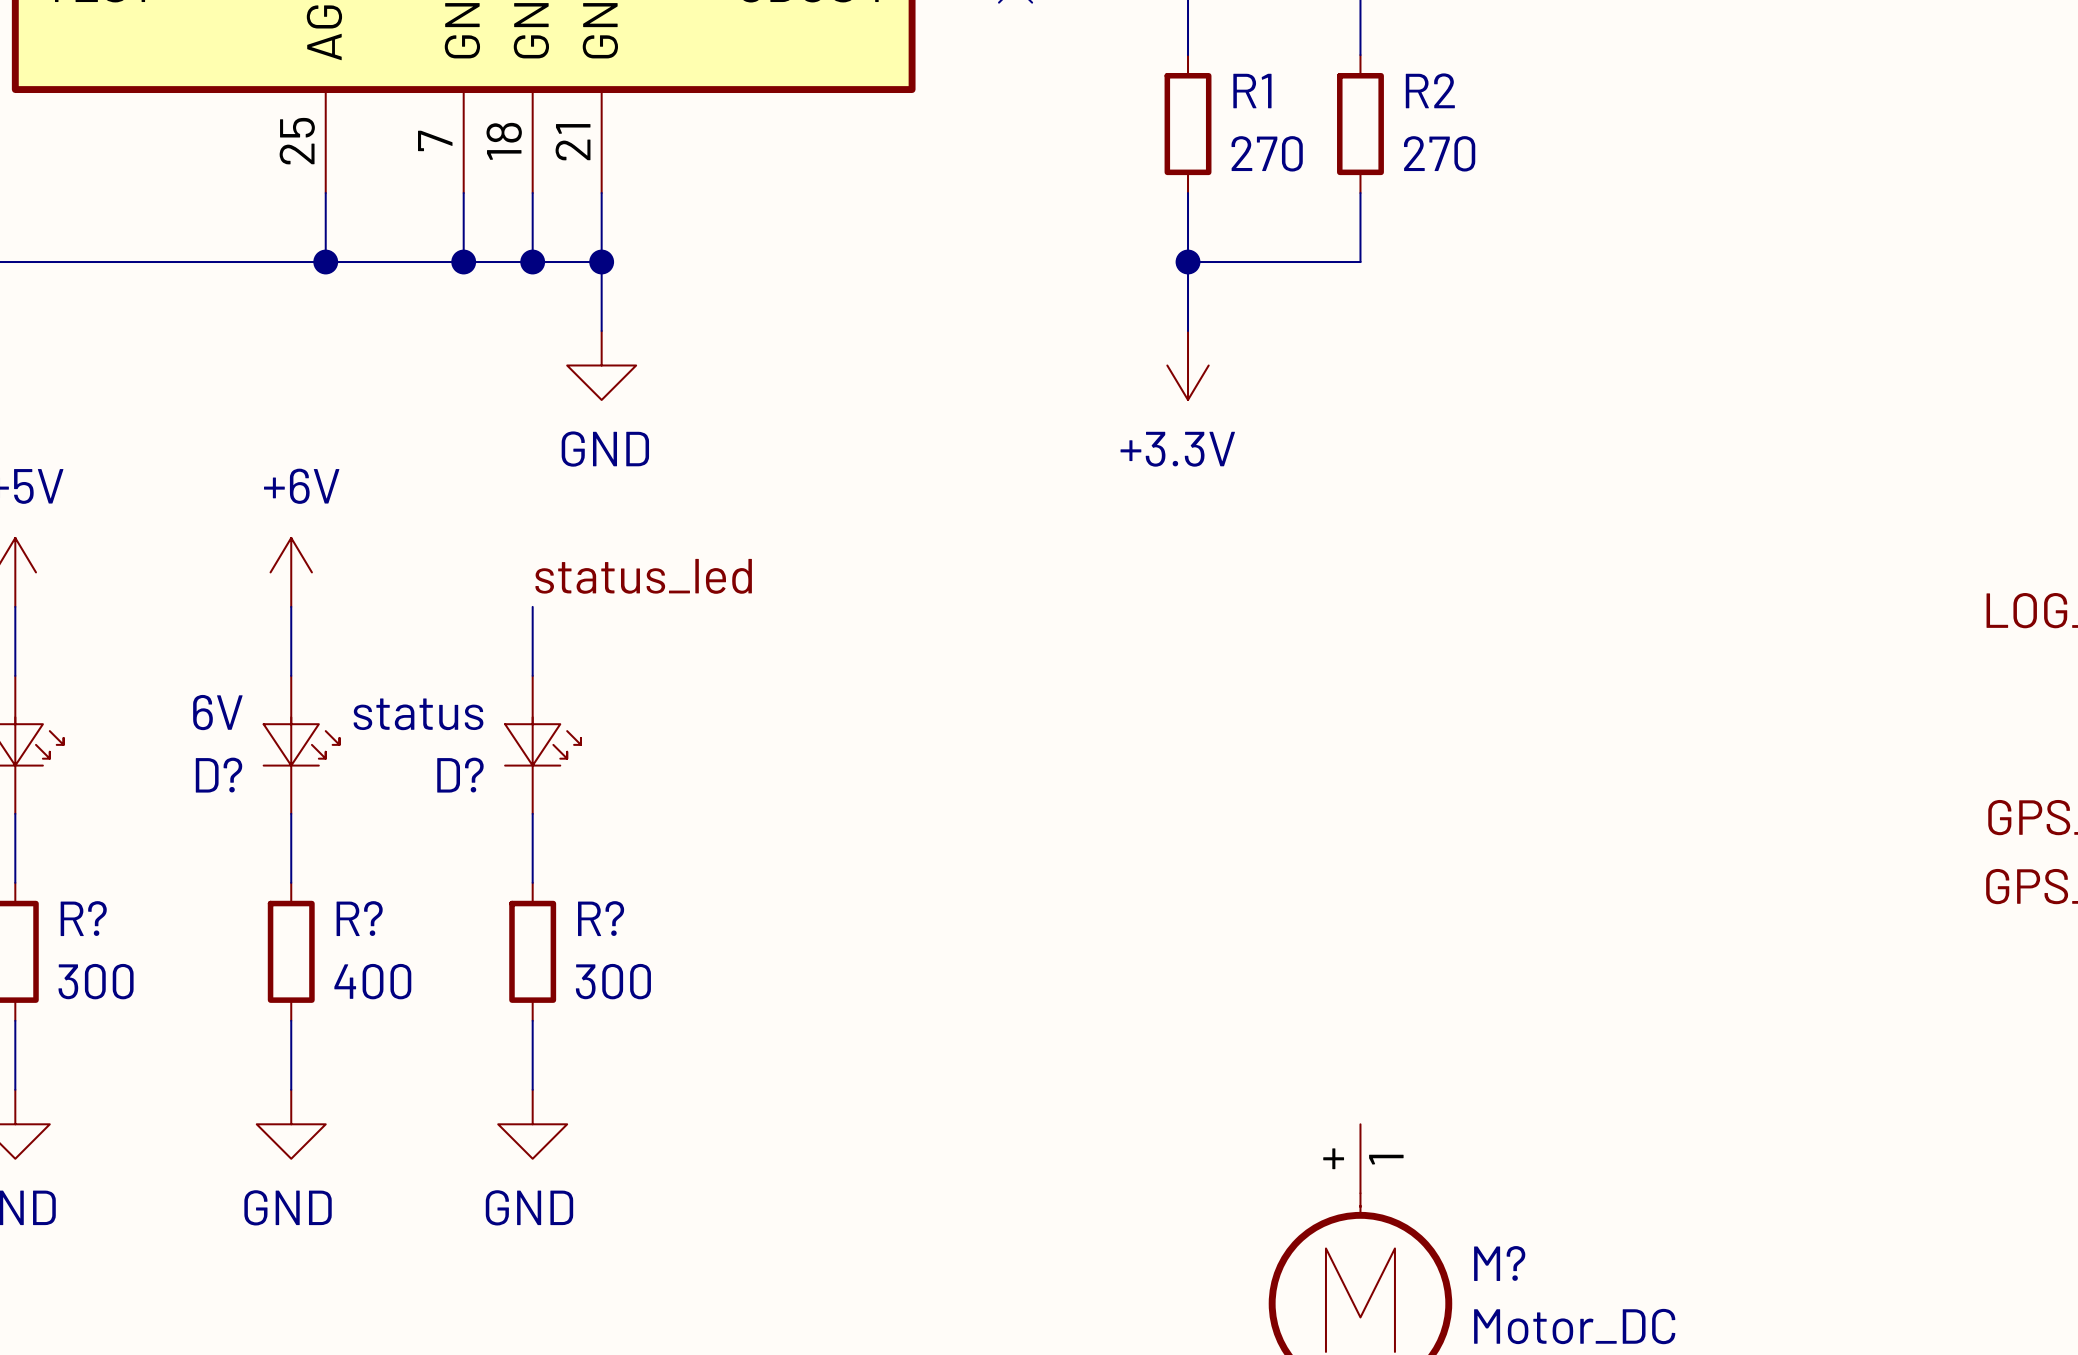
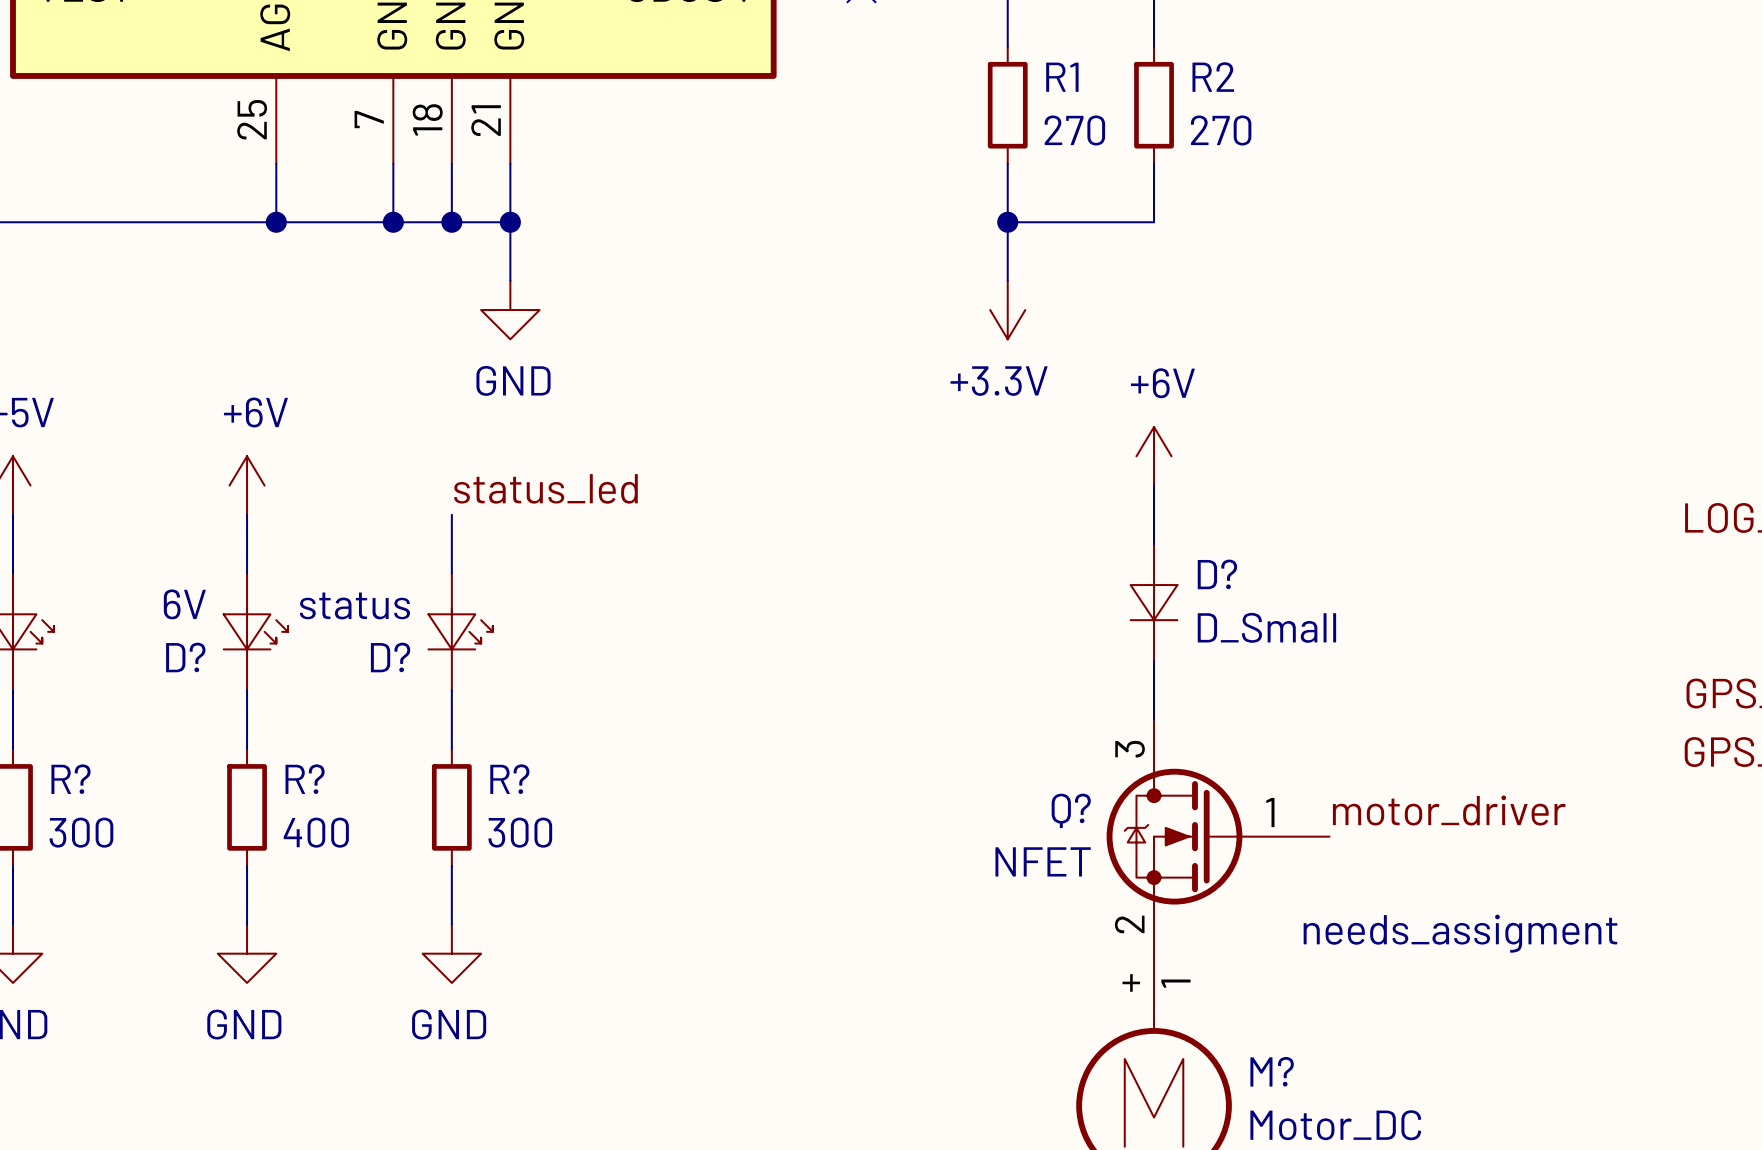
power symbol: none -> +6V (1154, 456)
wire: none -> (1154, 485) (1154, 544)
D?: none -> D_Small (1154, 602)
wire: none -> (1154, 661) (1154, 719)
label: none -> motor_driver (1449, 810)
Q?: none -> NFET (1218, 836)
text: none -> needs_assigment (1460, 933)

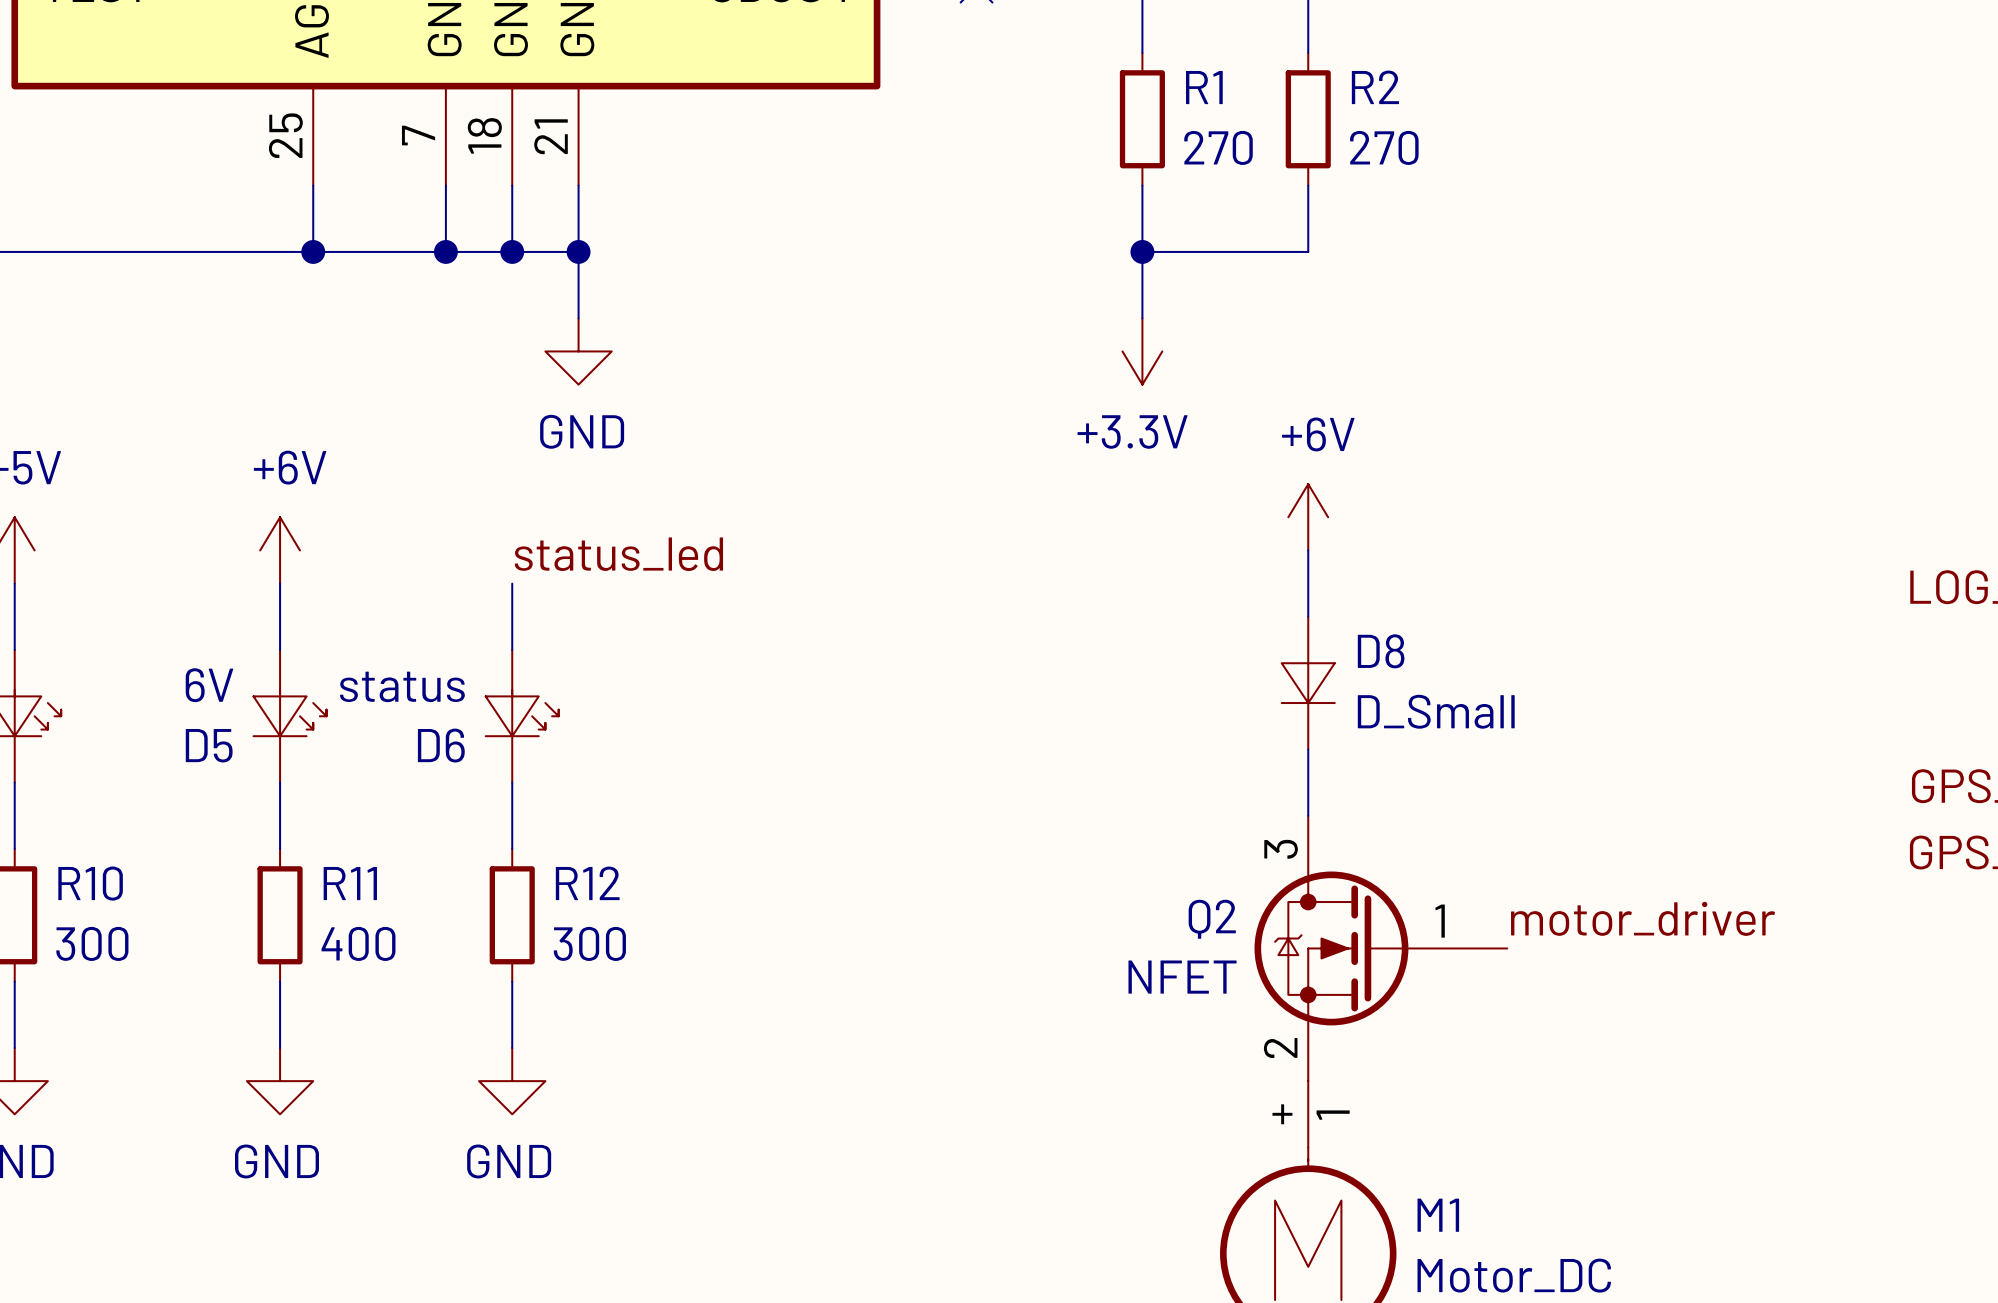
D? name: D? (1217, 574) -> D8 (1381, 651)
D? name: D? (185, 657) -> D5 (209, 745)
D? name: D? (390, 657) -> D6 (441, 745)
R? name: R? (71, 779) -> R10 (90, 883)
R? name: R? (305, 779) -> R11 (350, 883)
R? name: R? (509, 779) -> R12 (587, 883)
Q? name: Q? (1071, 810) -> Q2 (1212, 919)
text: needs_assigment (1460, 933) -> none
M? name: M? (1272, 1071) -> M1 (1438, 1215)

